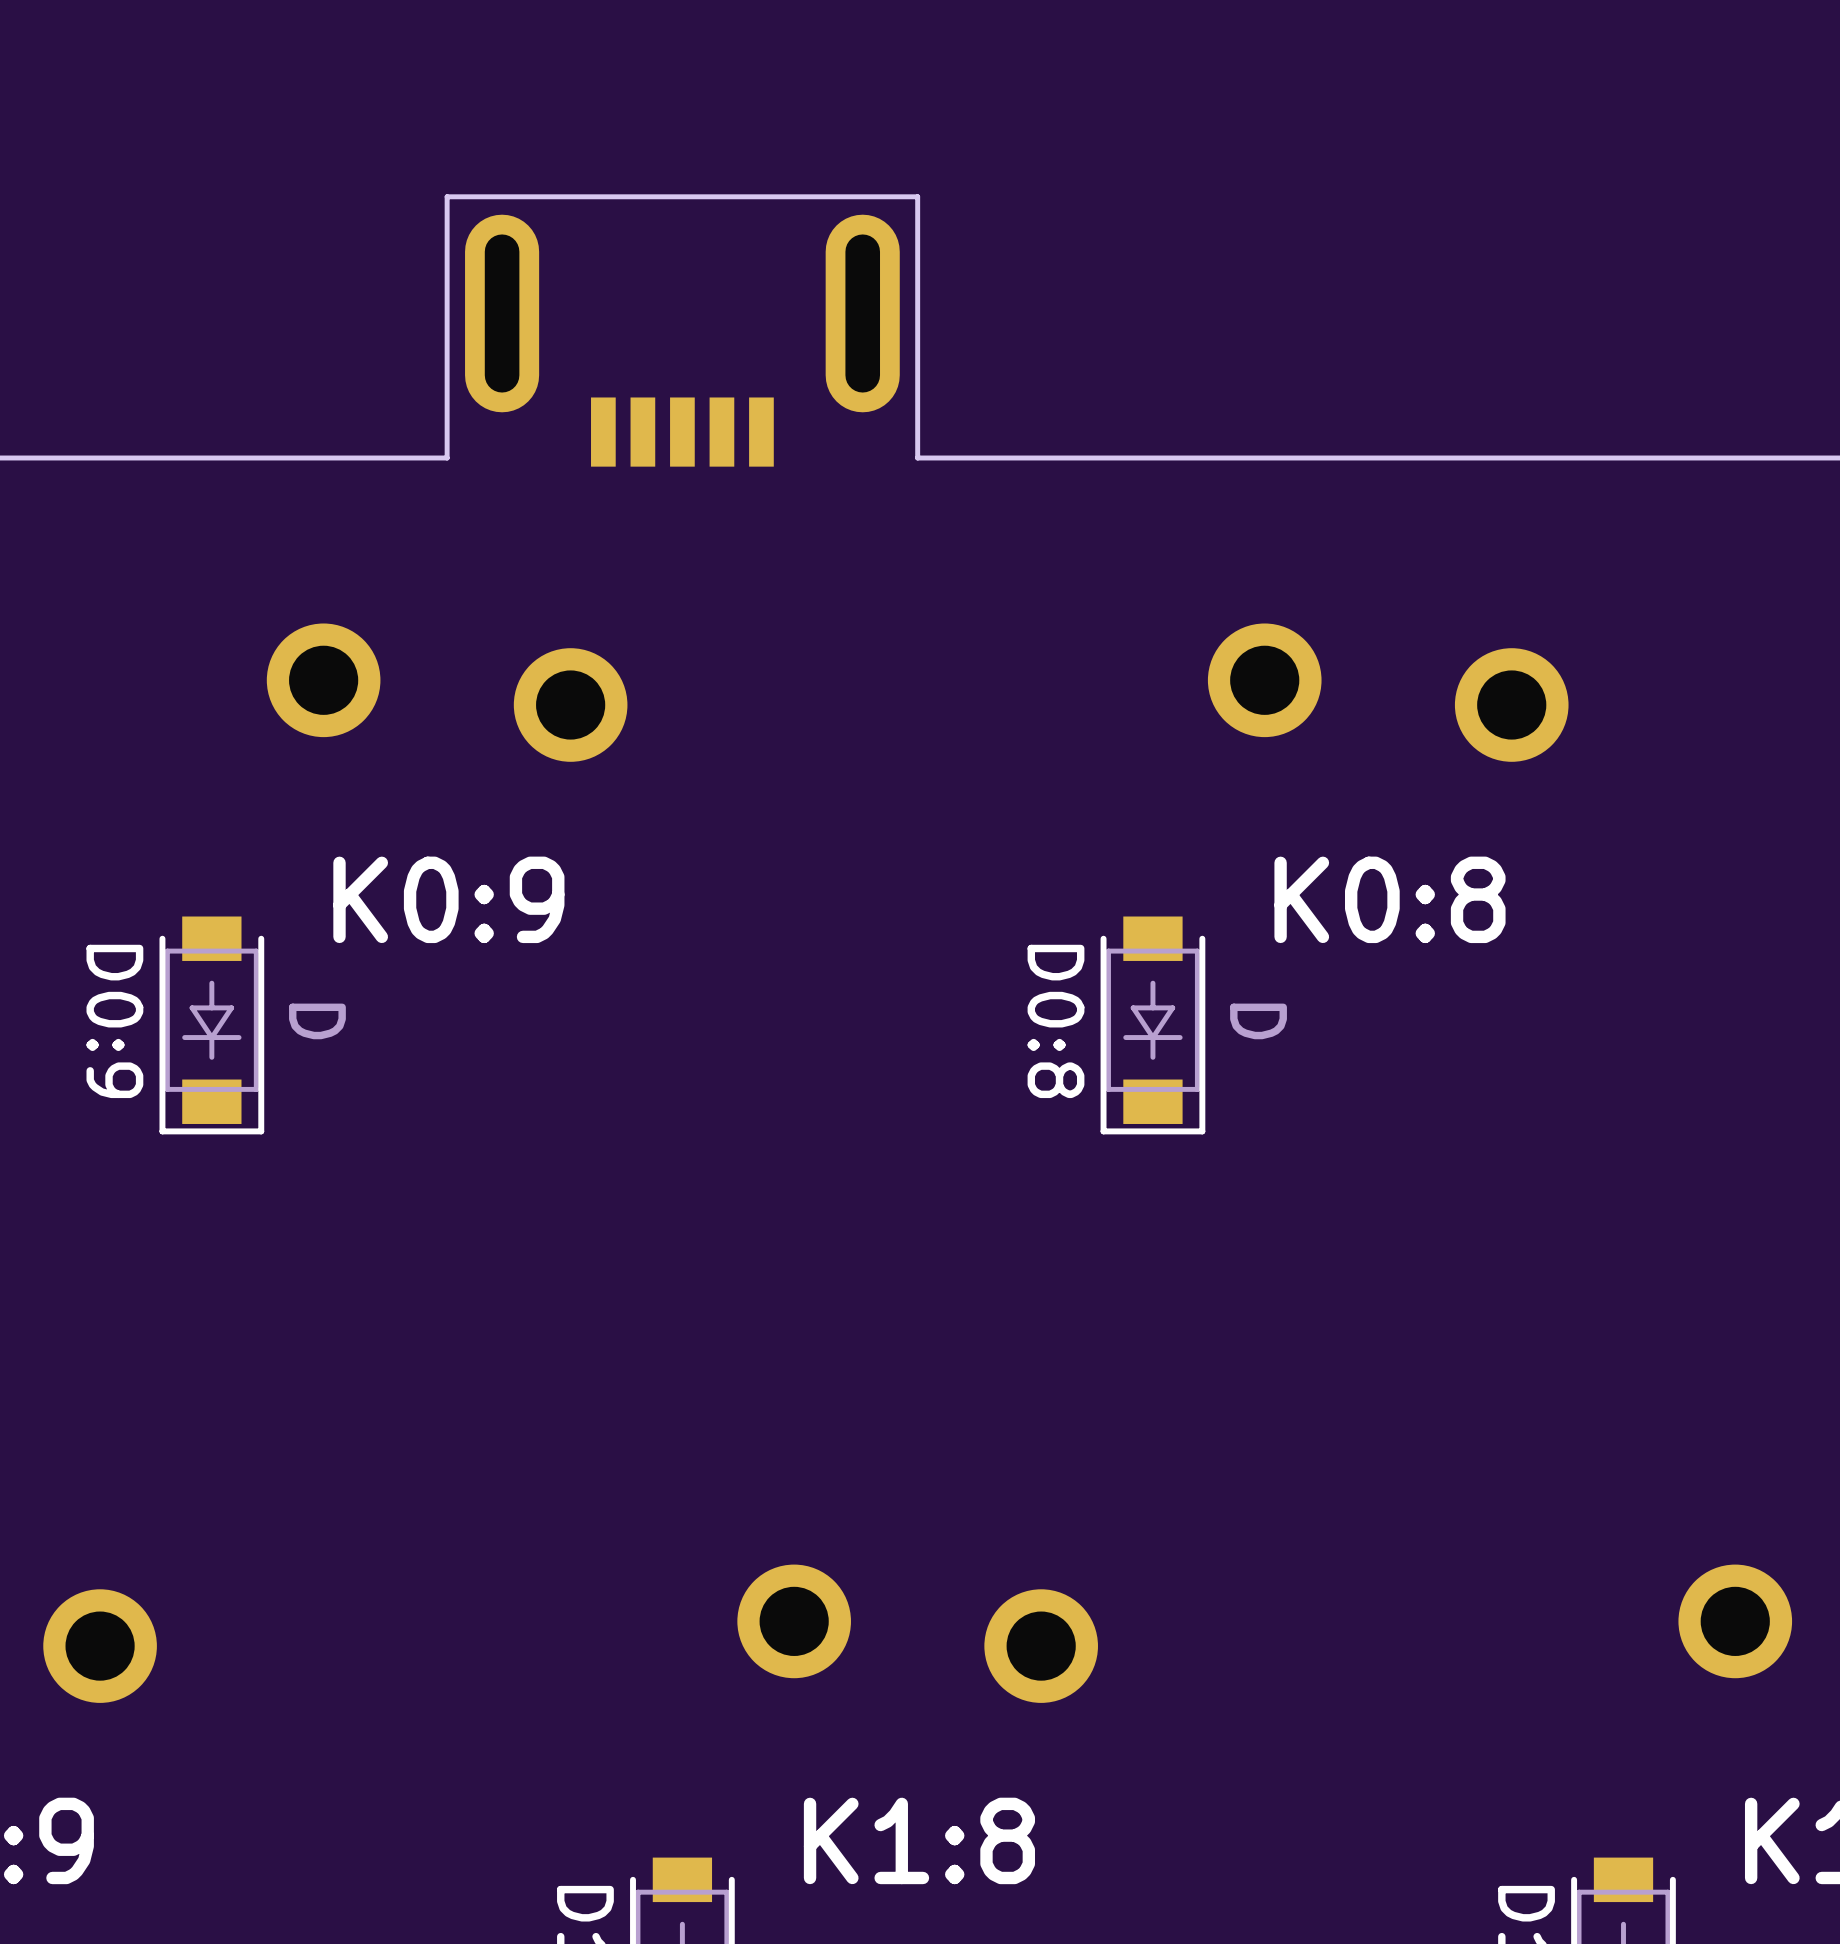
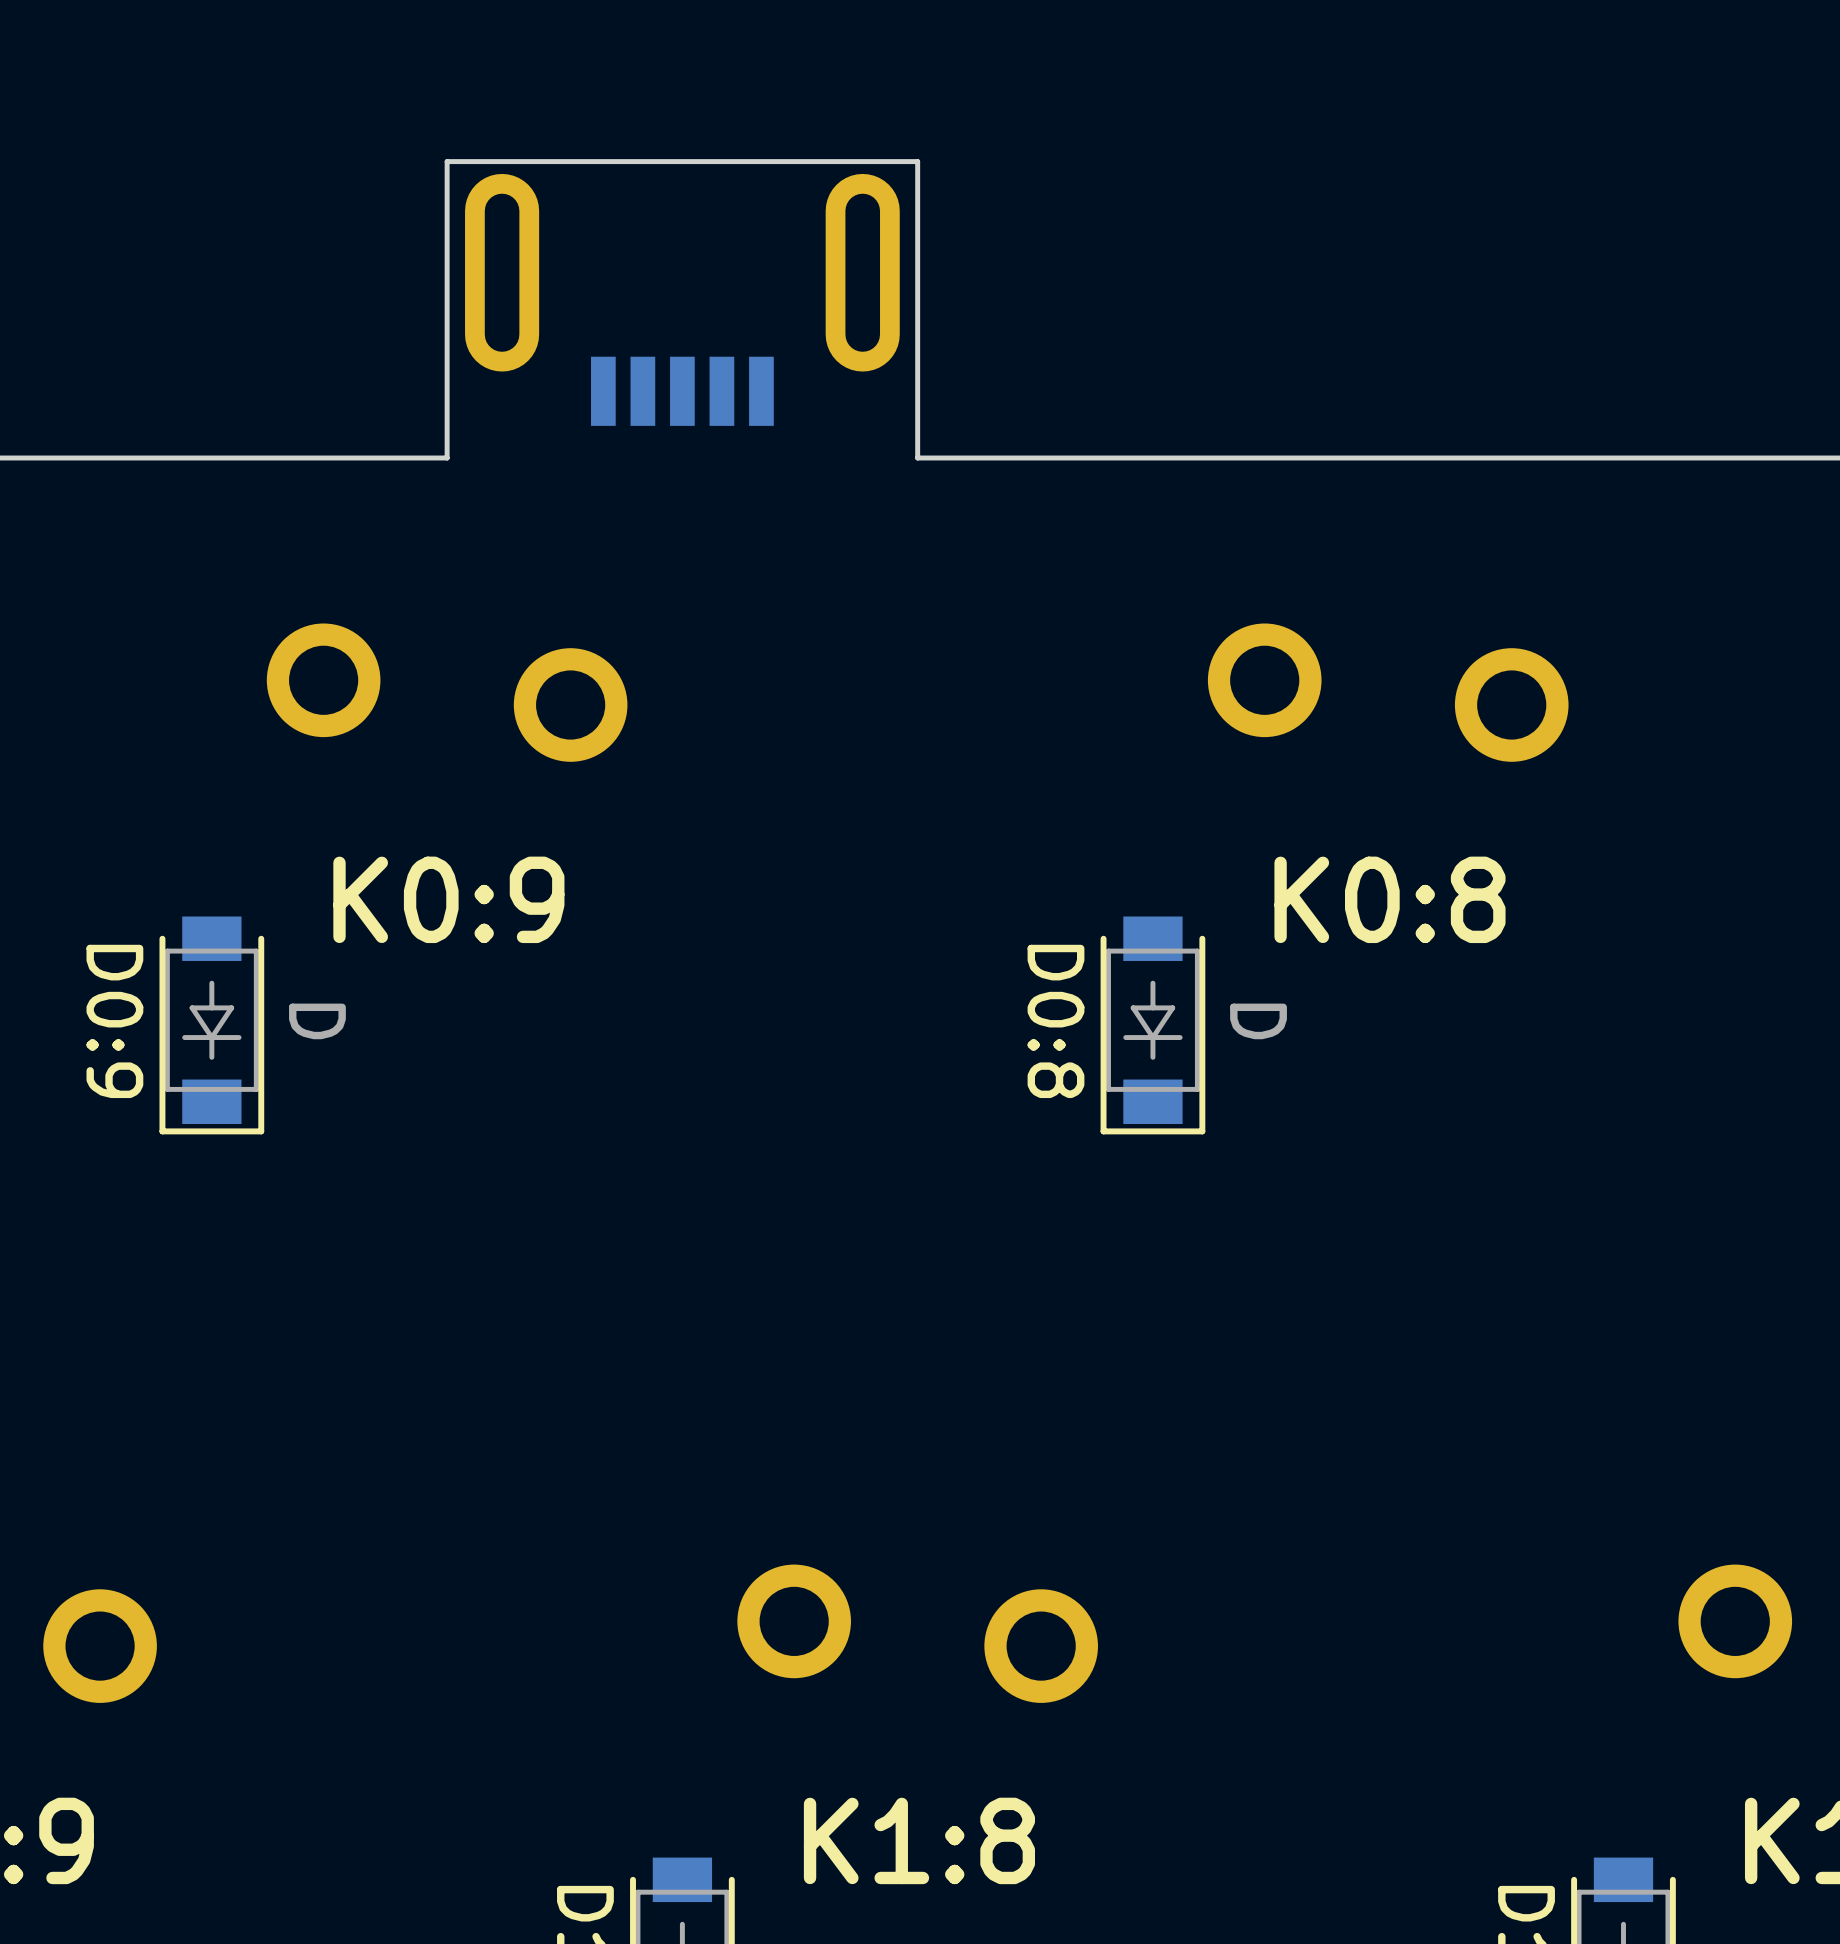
board edge: (917, 196) (447, 196) -> (917, 196) (917, 161) (447, 161) (447, 196)
part position: (682, 340) -> (682, 299)

